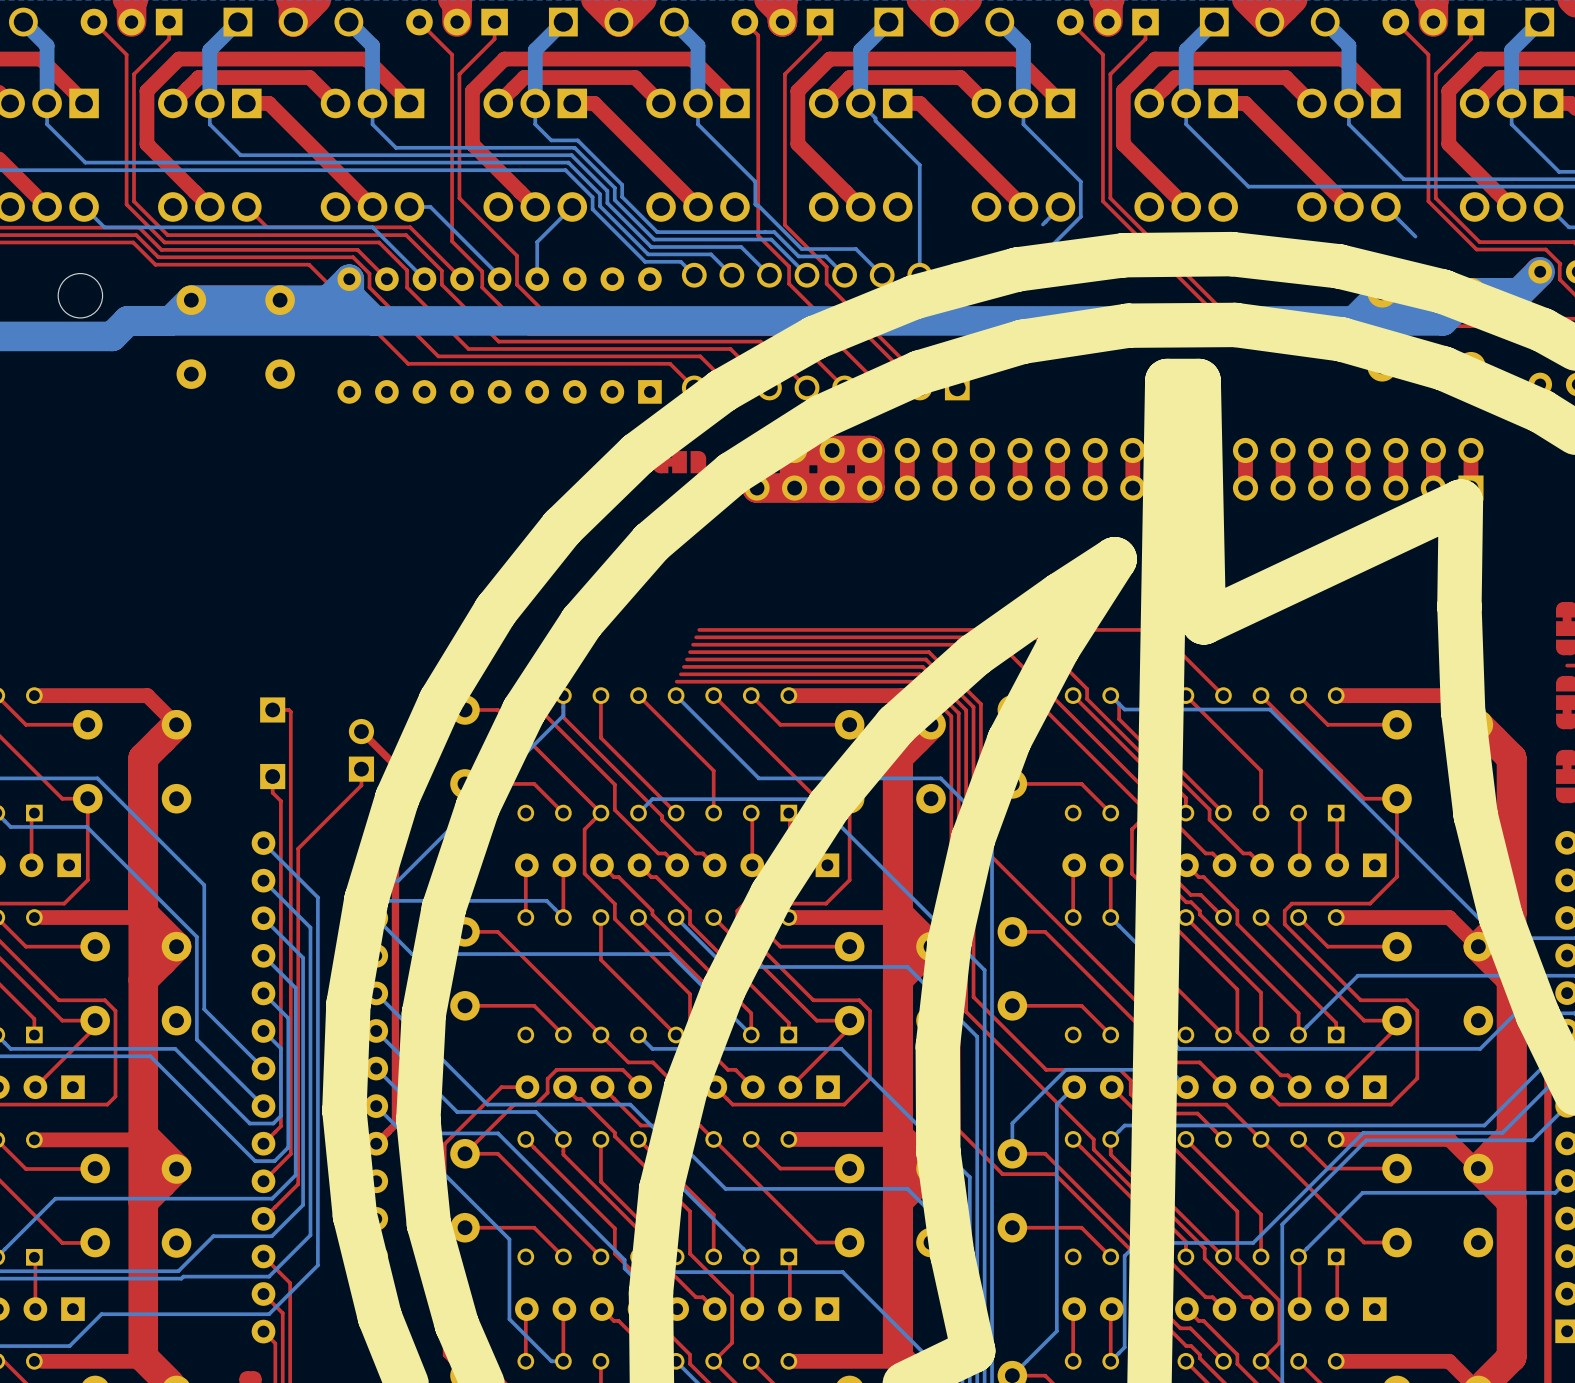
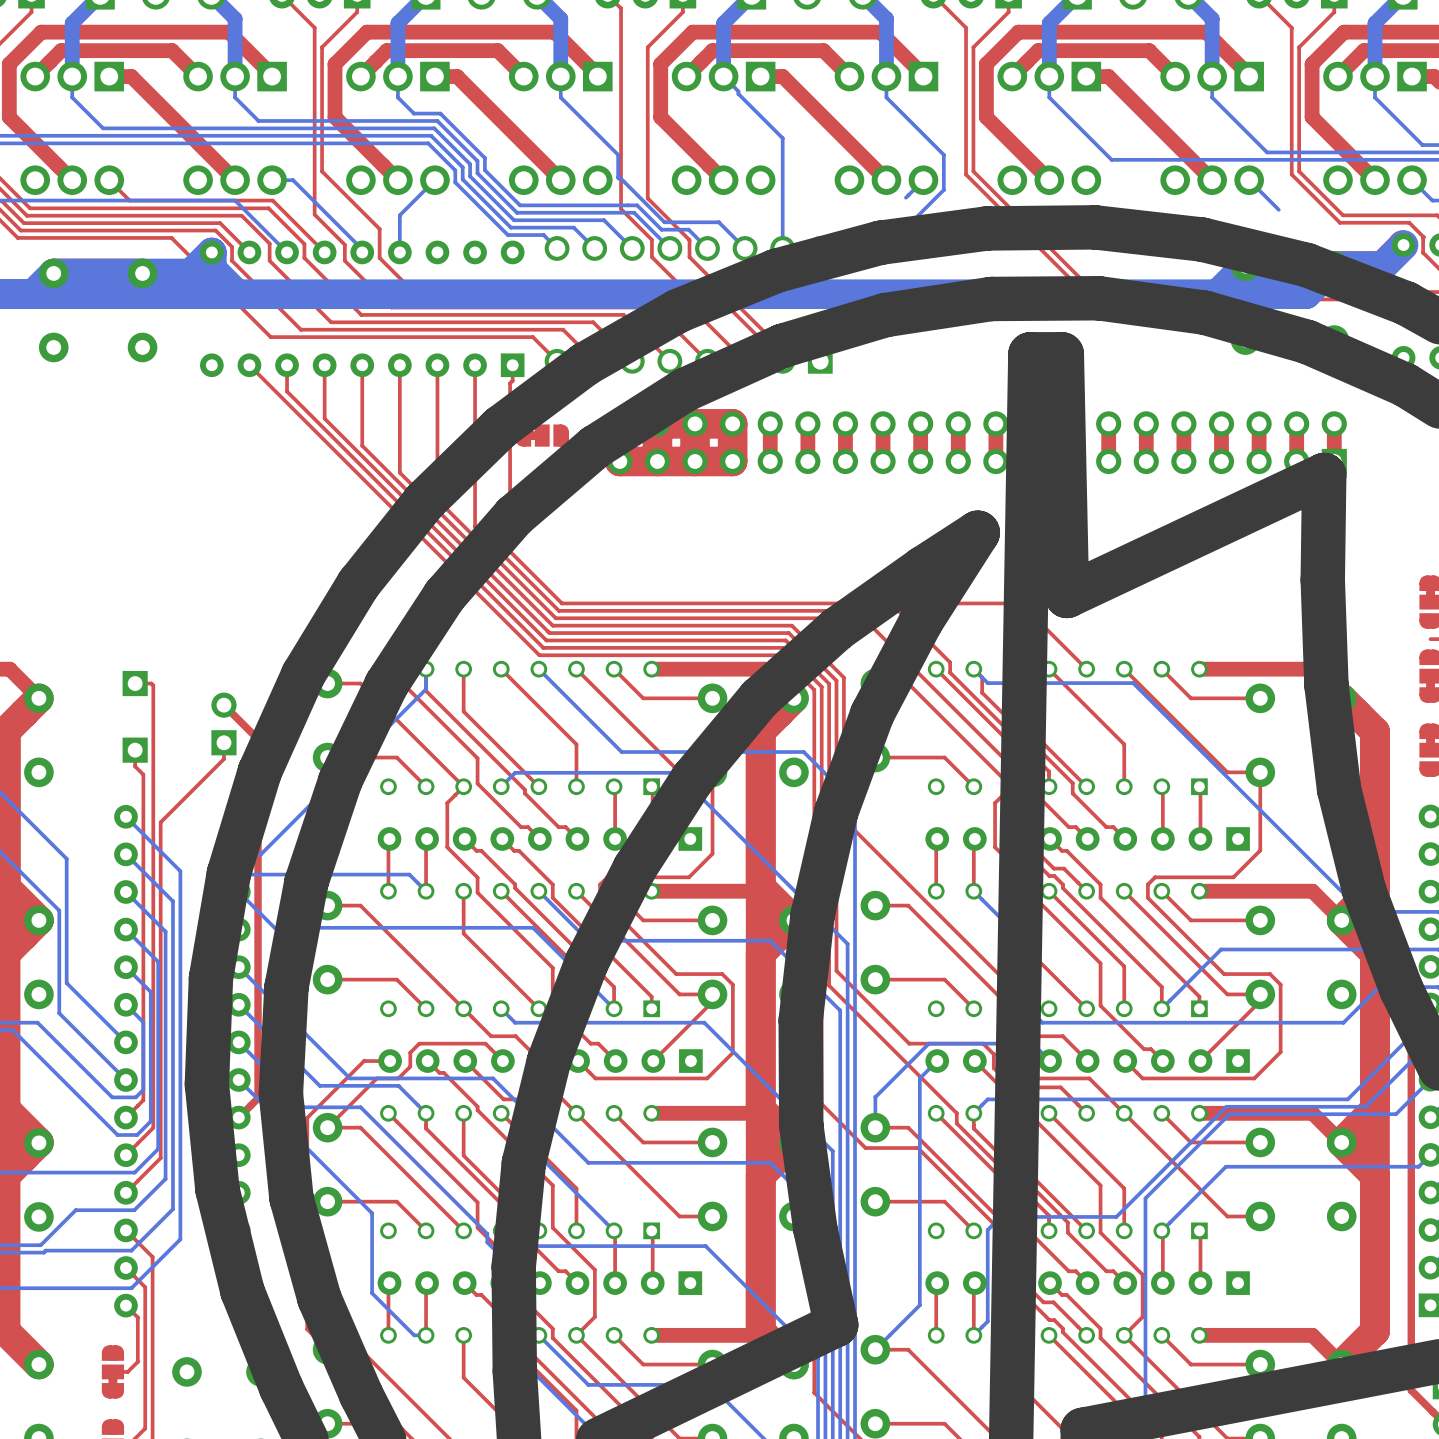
top track: none -> (249, 365) (539, 655)
top track: none -> (287, 365) (287, 391) (543, 647)
top track: none -> (324, 365) (324, 418) (546, 640)
top track: none -> (362, 365) (362, 445) (549, 633)
top track: none -> (399, 365) (399, 472) (552, 625)
top track: none -> (437, 365) (437, 499) (555, 618)
top track: none -> (475, 365) (475, 526) (558, 610)
top track: none -> (512, 365) (512, 380) (510, 383) (510, 551) (562, 603)

